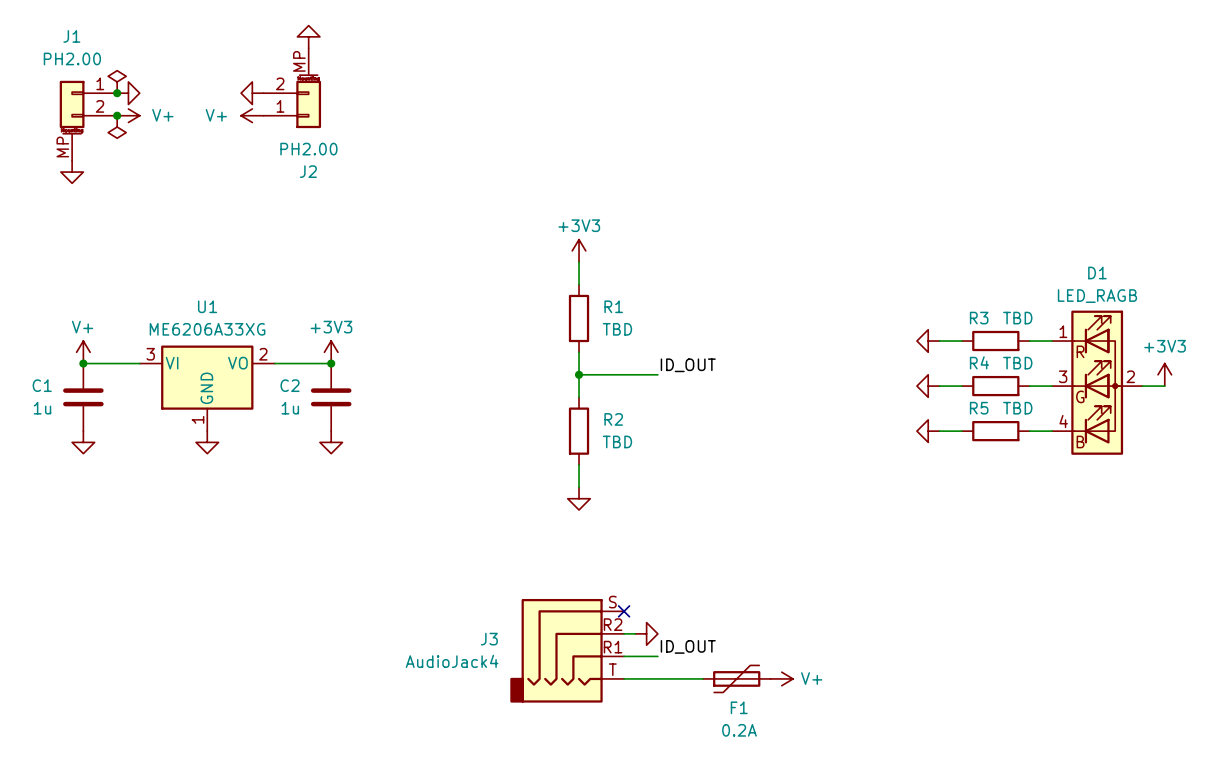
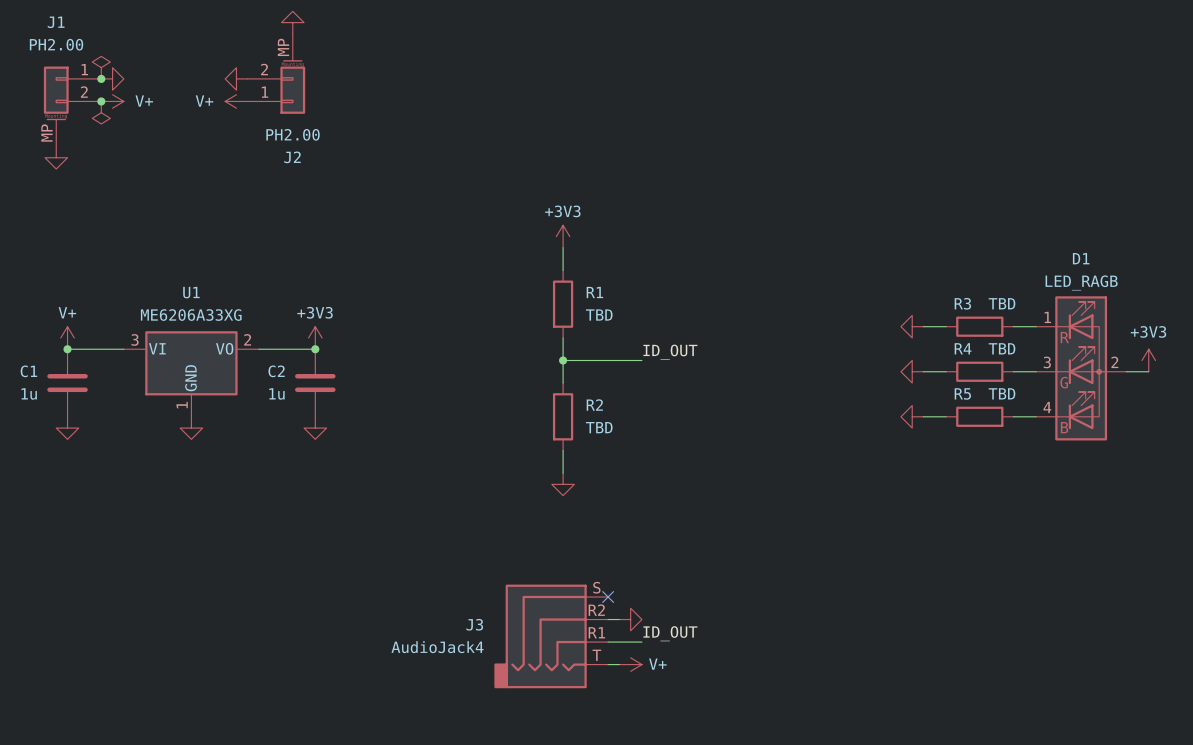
wire: (635, 678) (702, 678) -> none
F1: 0.2A (736, 678) -> none
power symbol position: V+ (781, 678) -> V+ (630, 664)

